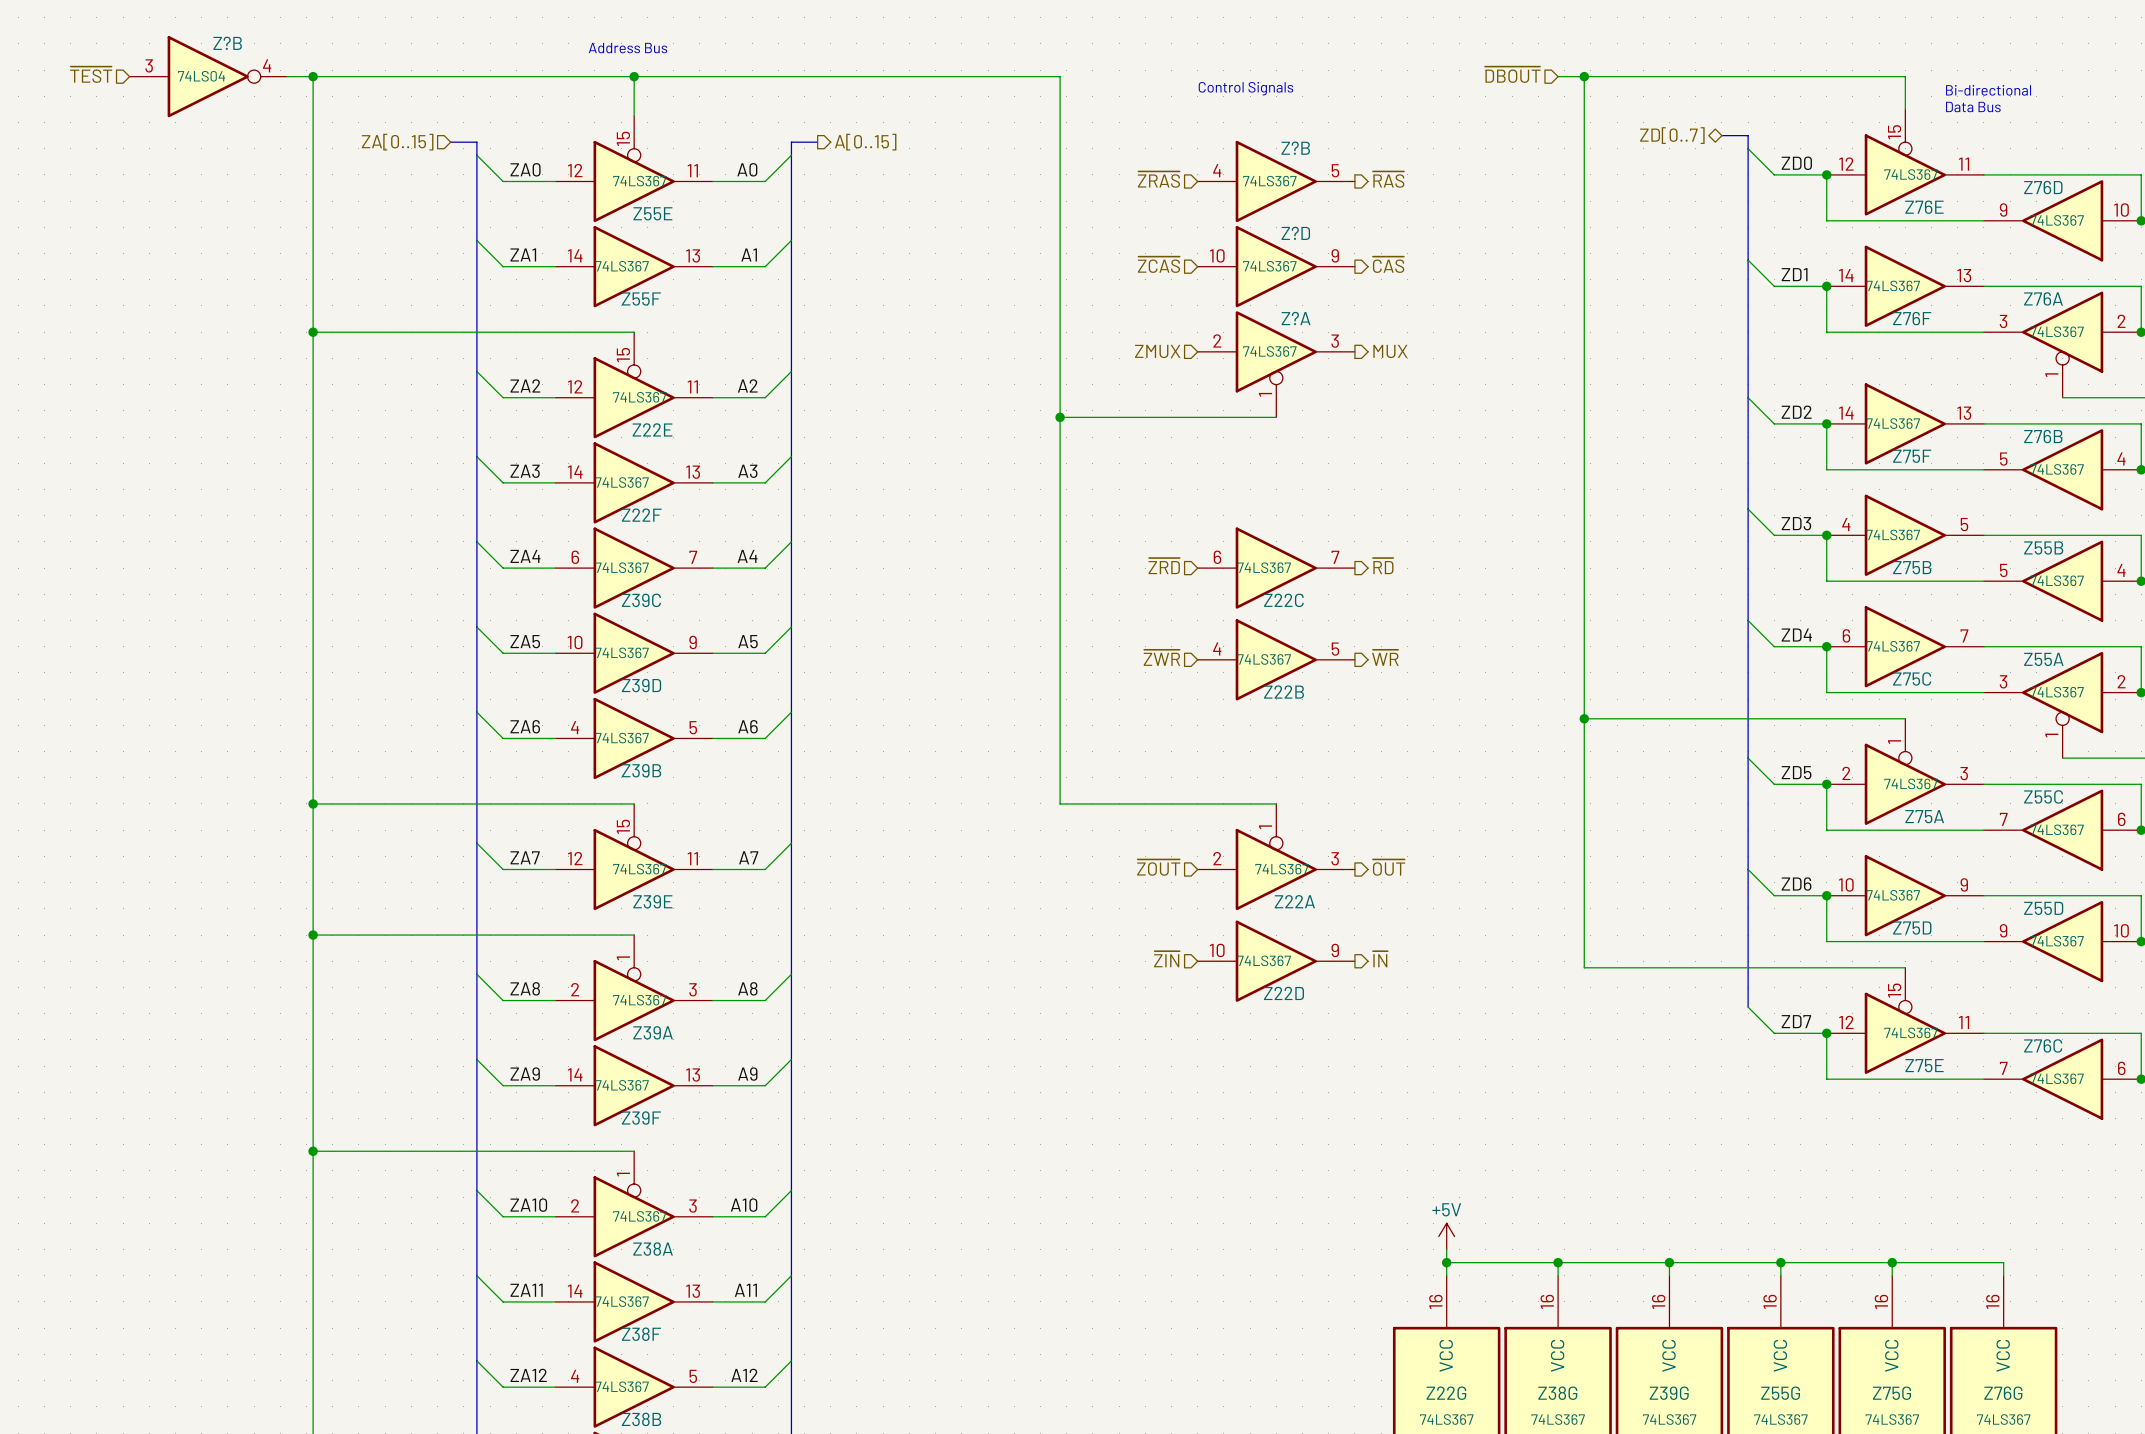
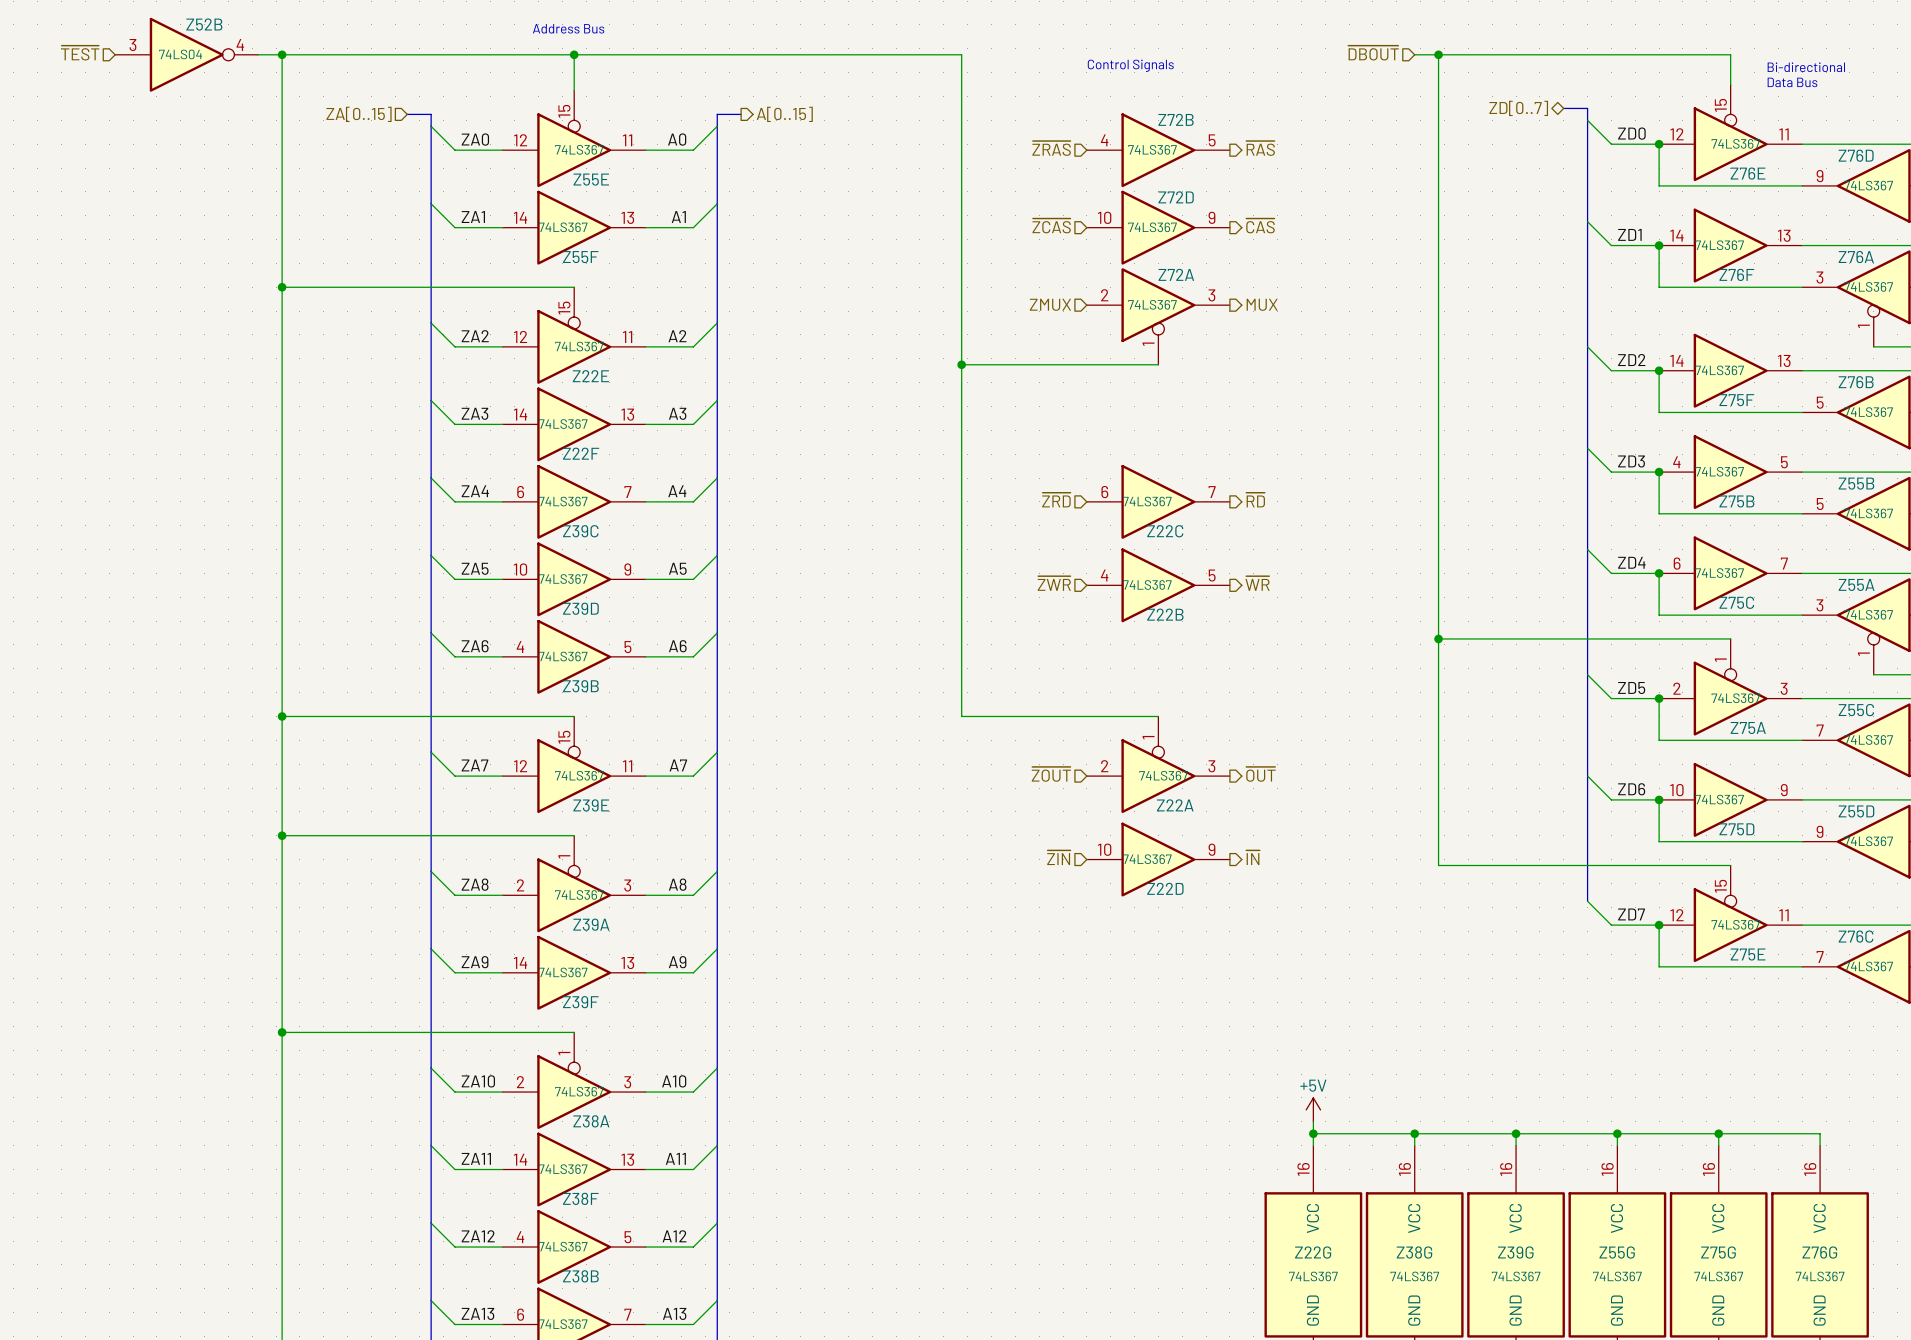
Z?B name: Z?B (227, 43) -> Z52B (204, 24)
Z?B name: Z?B (1295, 148) -> Z72B (1176, 119)
Z?D name: Z?D (1295, 233) -> Z72D (1176, 197)
Z?A name: Z?A (1296, 318) -> Z72A (1176, 274)

